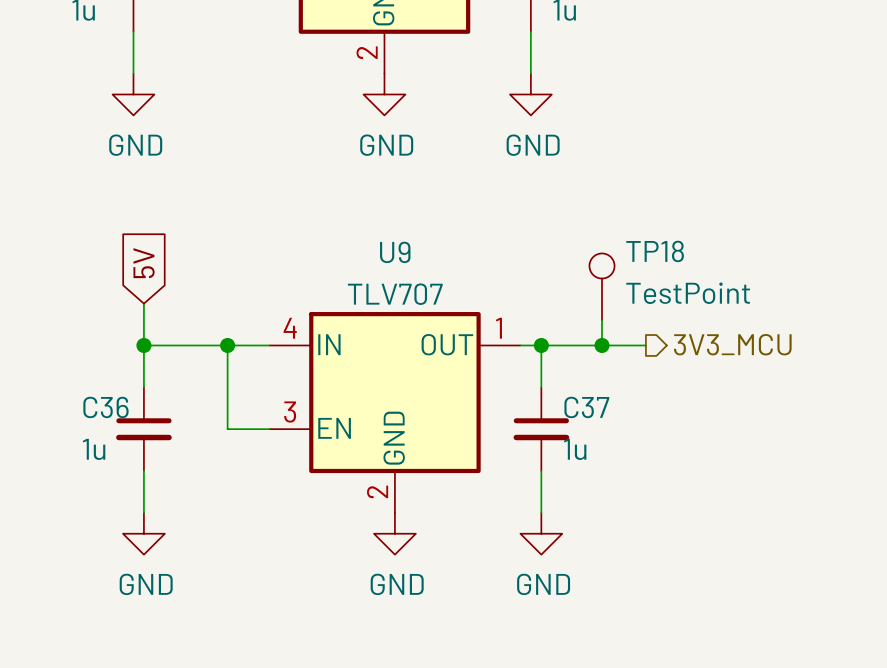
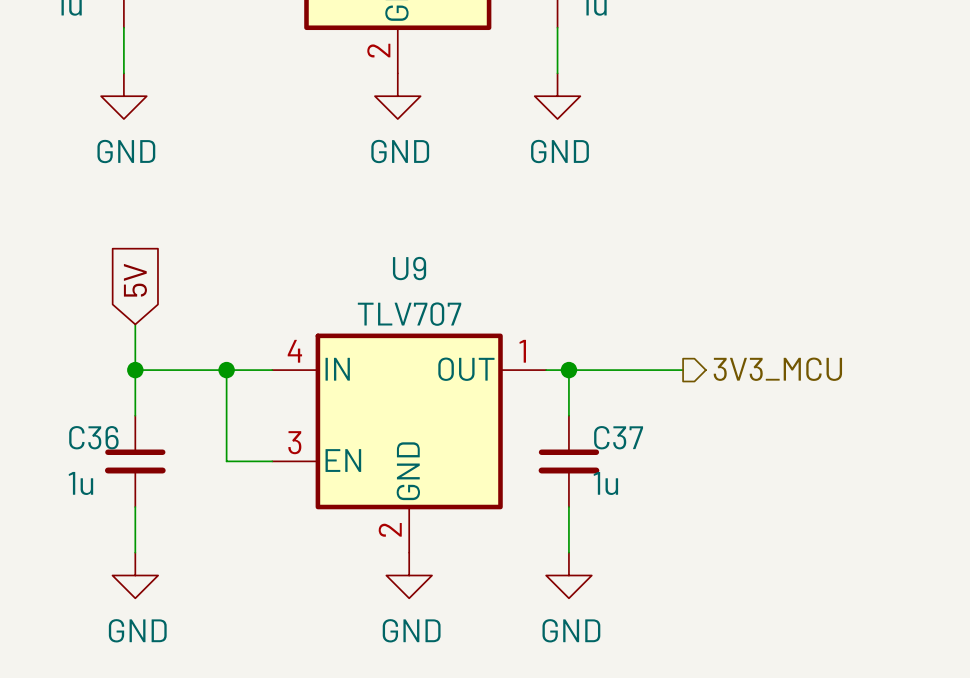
TP18: TestPoint (602, 286) -> none
wire: (602, 320) (602, 345) -> none
junction: (602, 345) -> none

